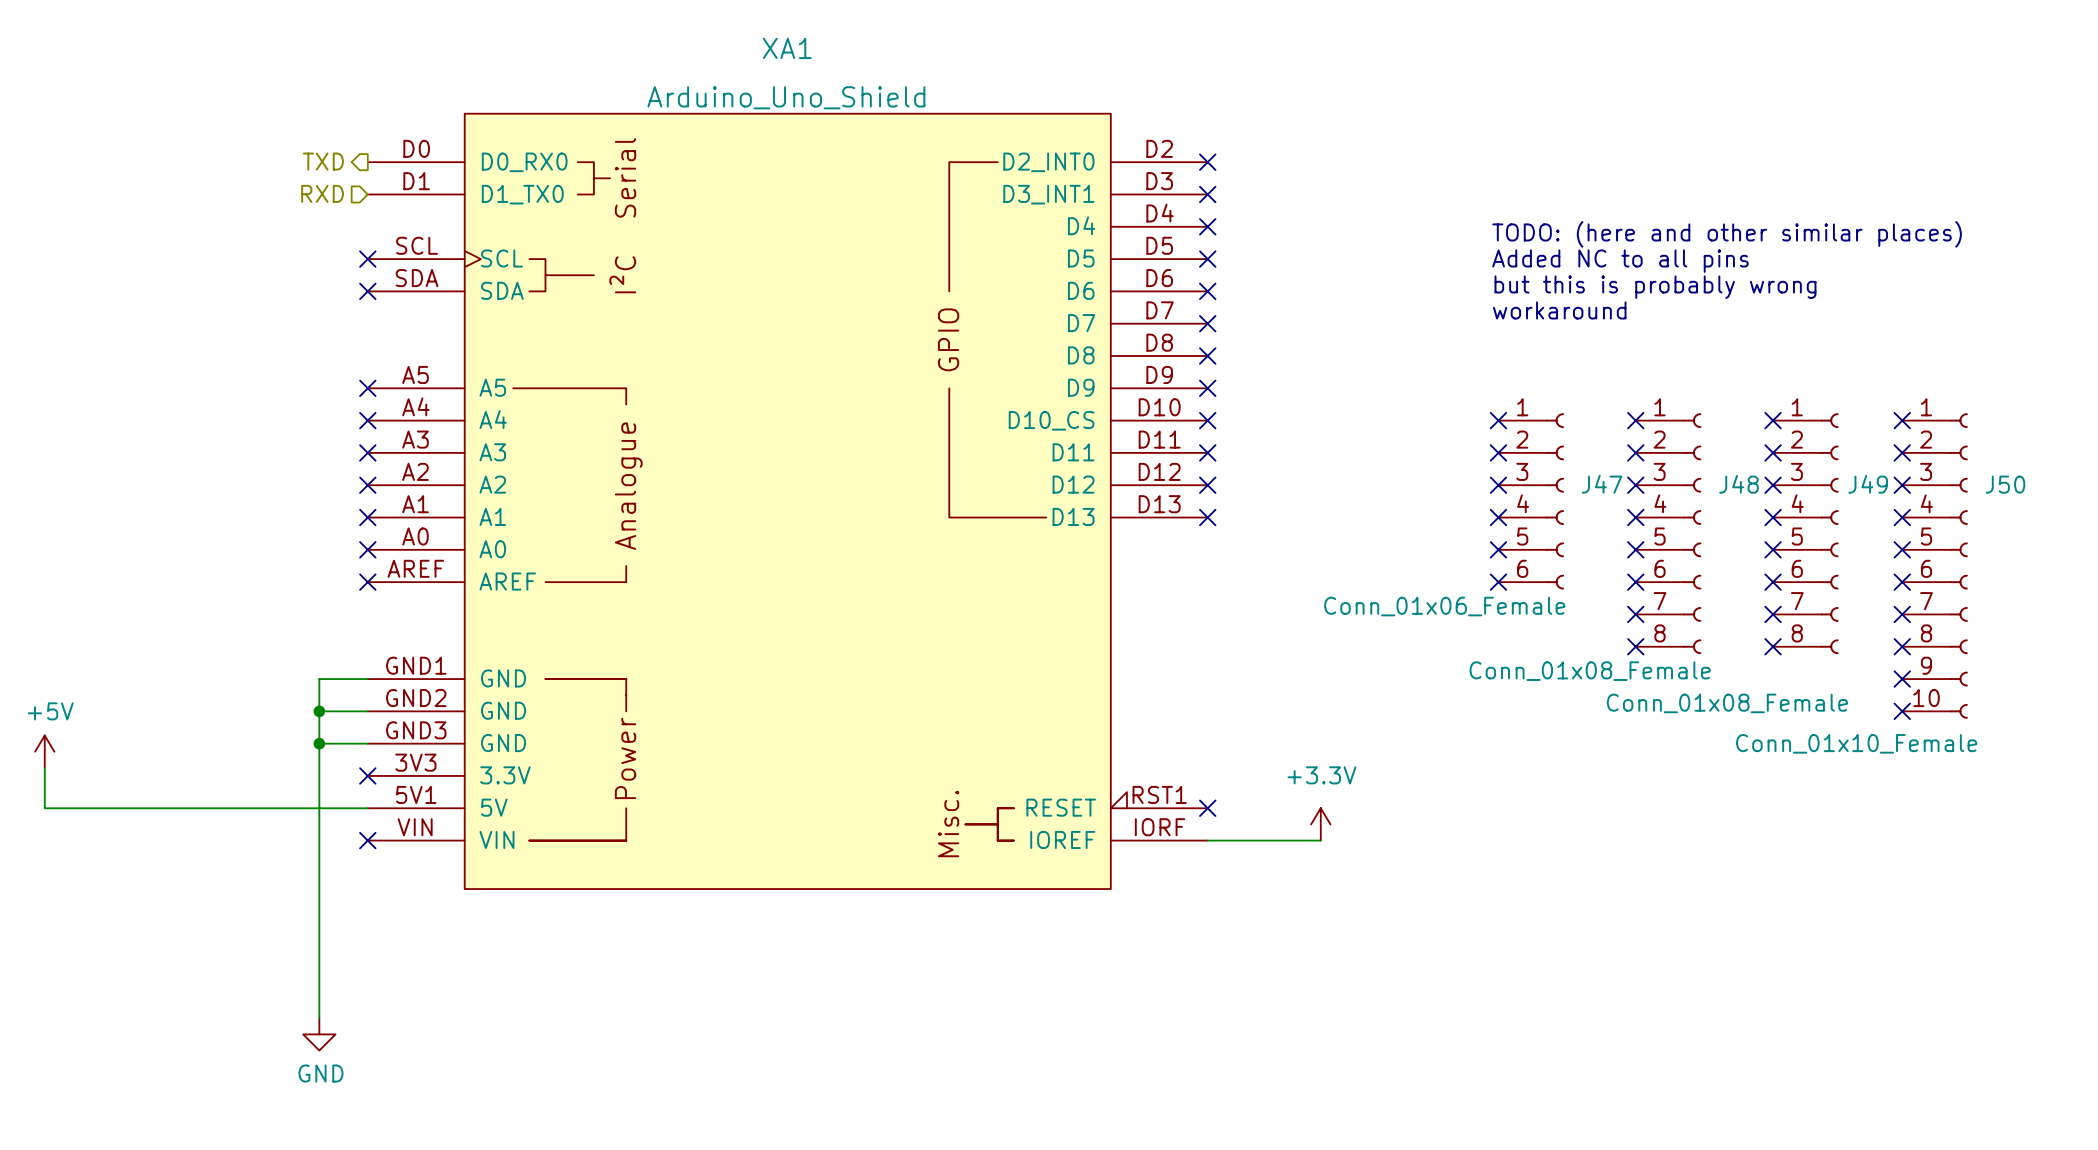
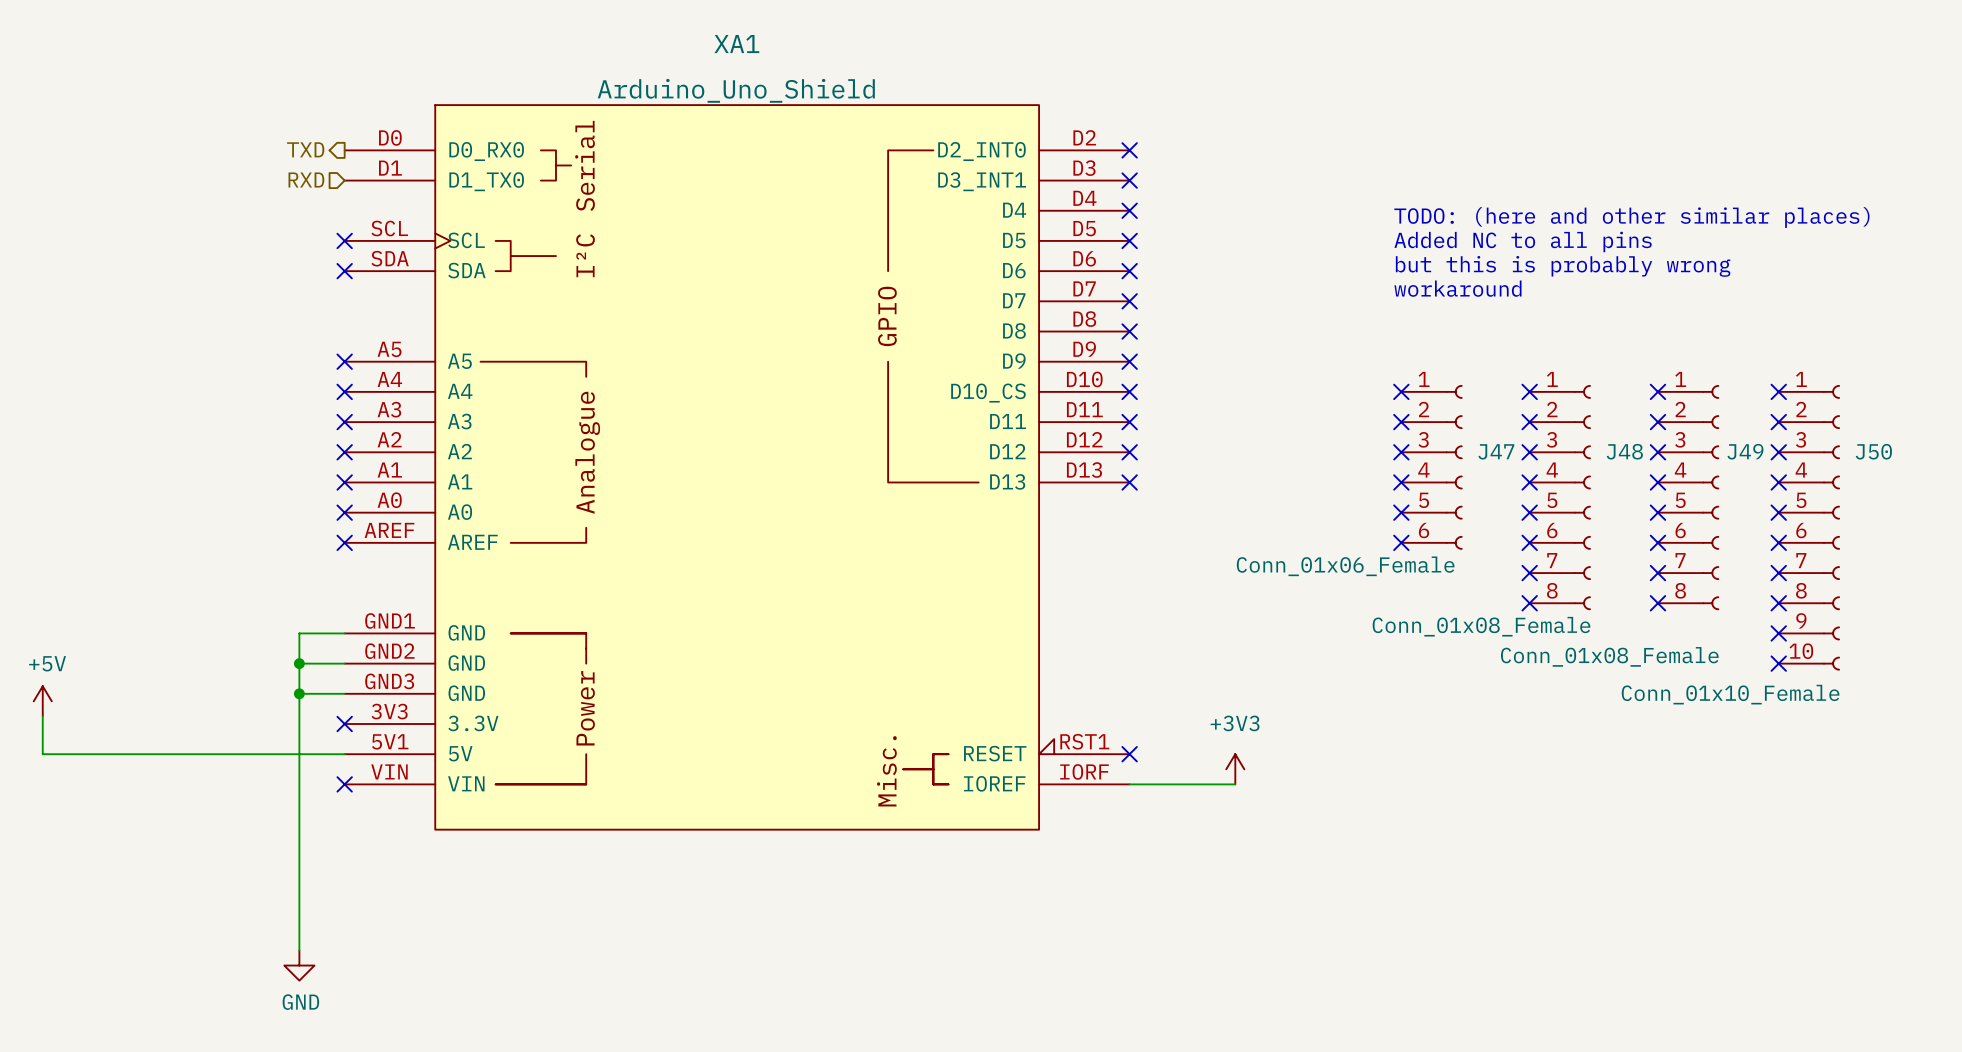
power symbol: +3.3V (1320, 824) -> +3V3 (1235, 769)

